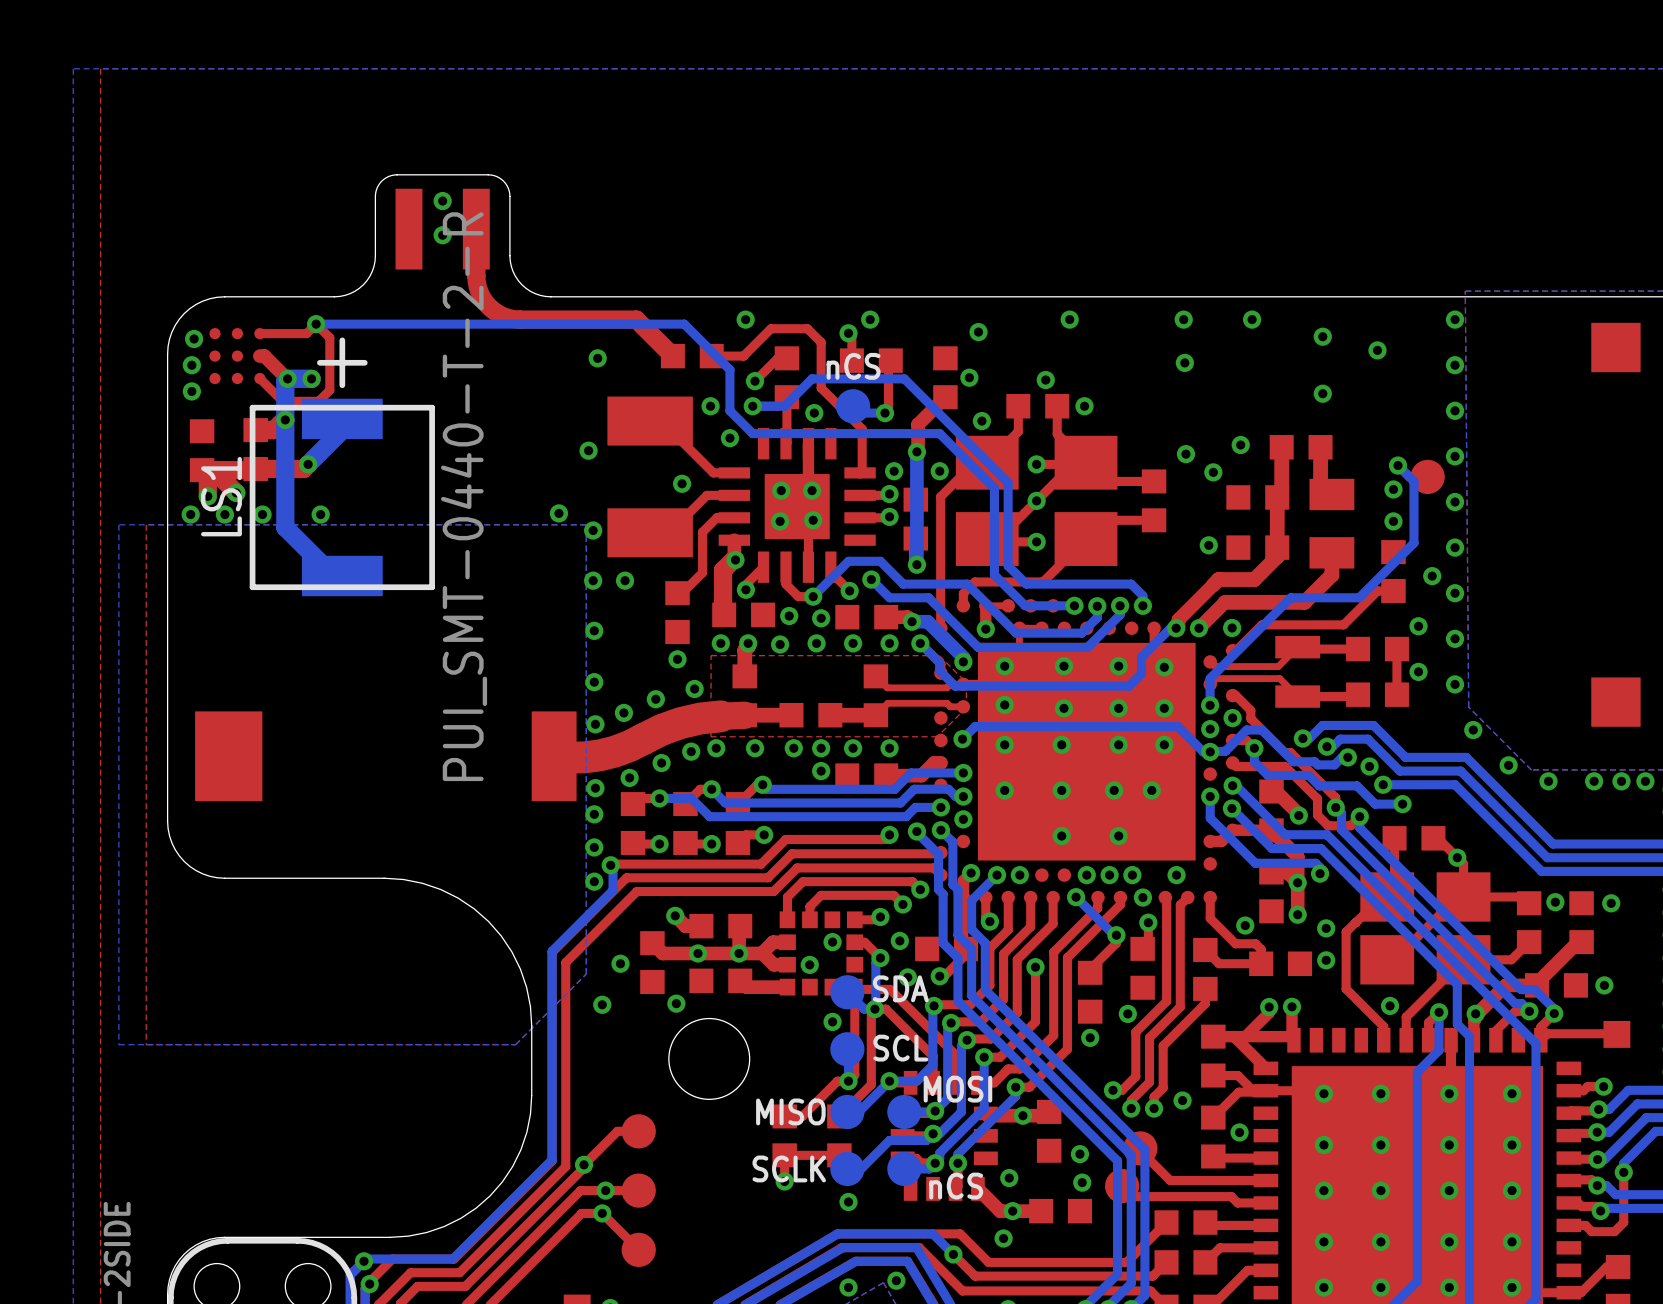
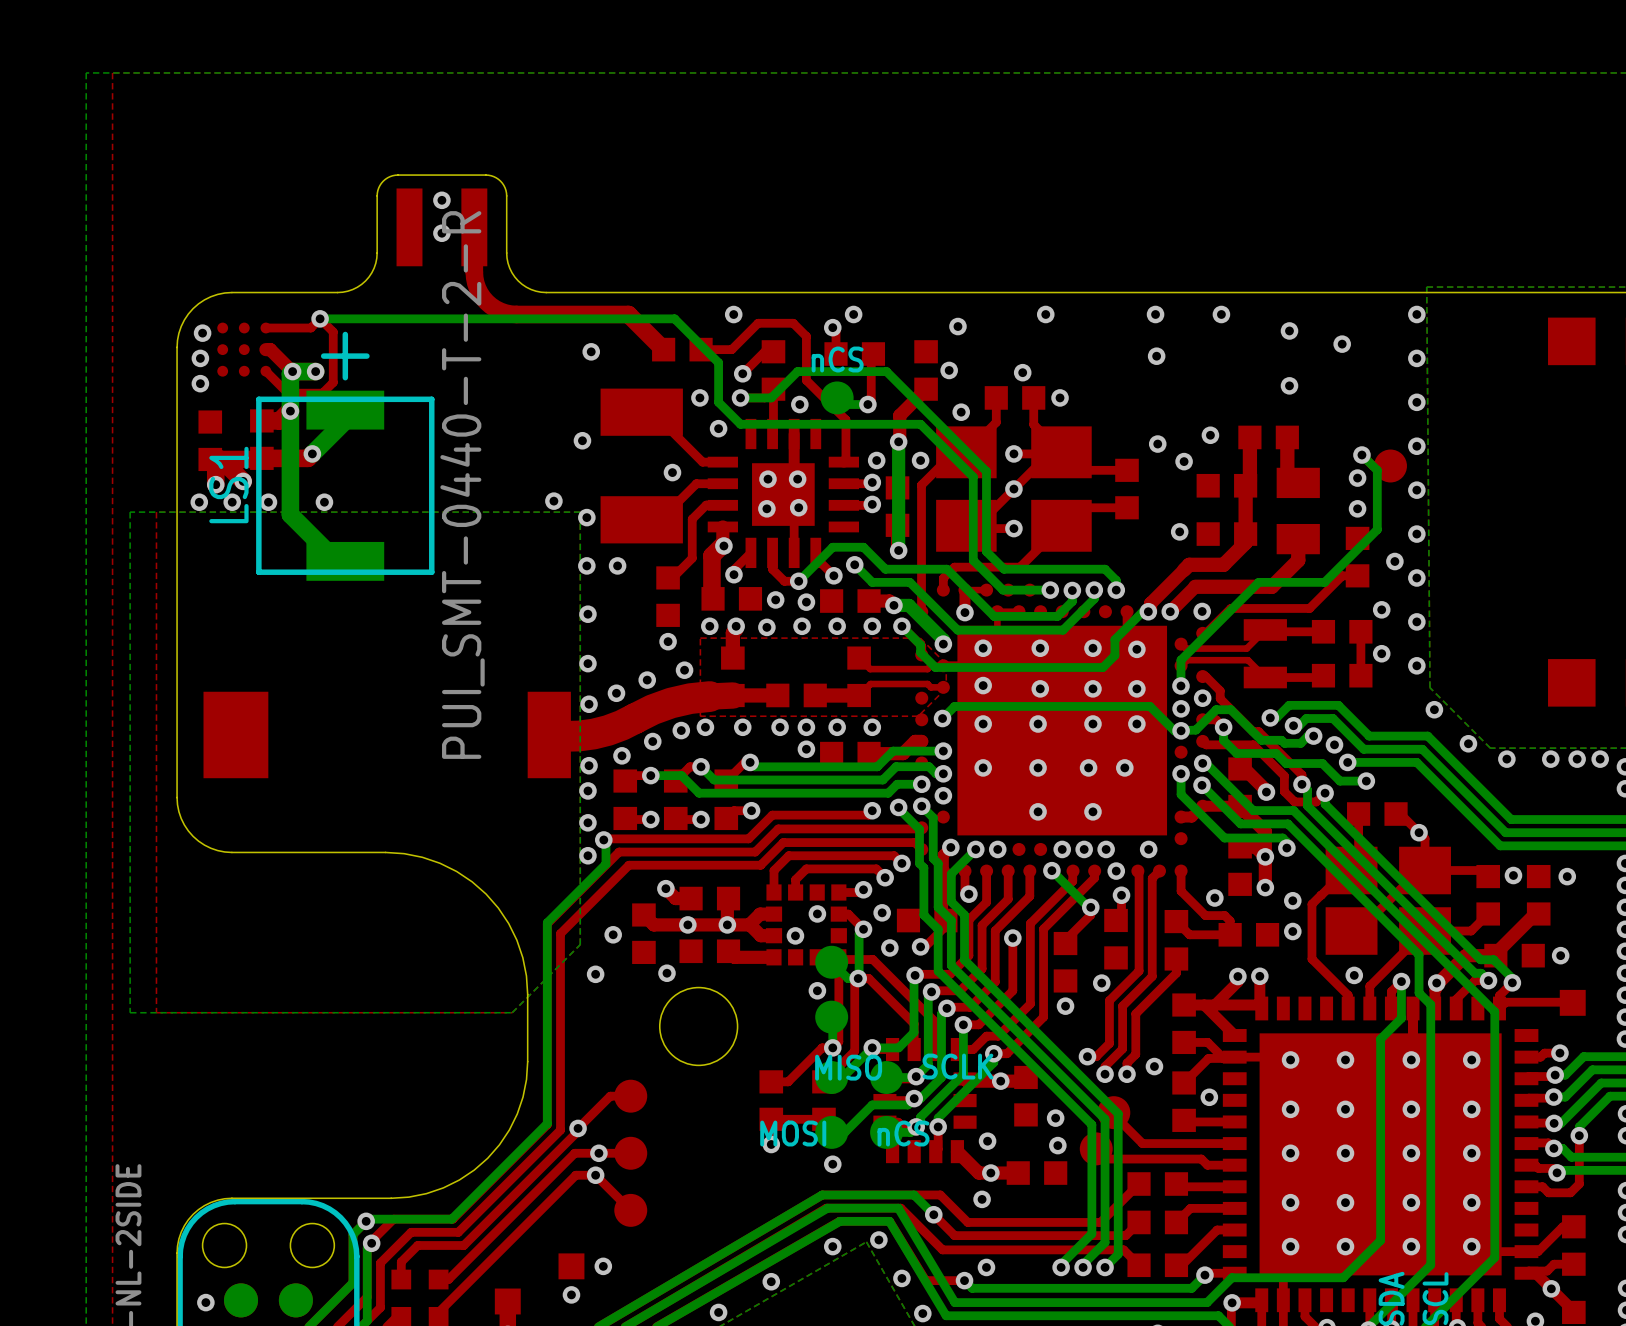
text: SDA (900, 988) -> none
text: SCL (900, 1048) -> none
text position: MOSI (957, 1089) -> MOSI (793, 1133)
text position: MISO (790, 1111) -> MISO (848, 1067)
text position: SCLK (789, 1168) -> SCLK (957, 1066)
text position: nCS (956, 1186) -> nCS (903, 1133)

